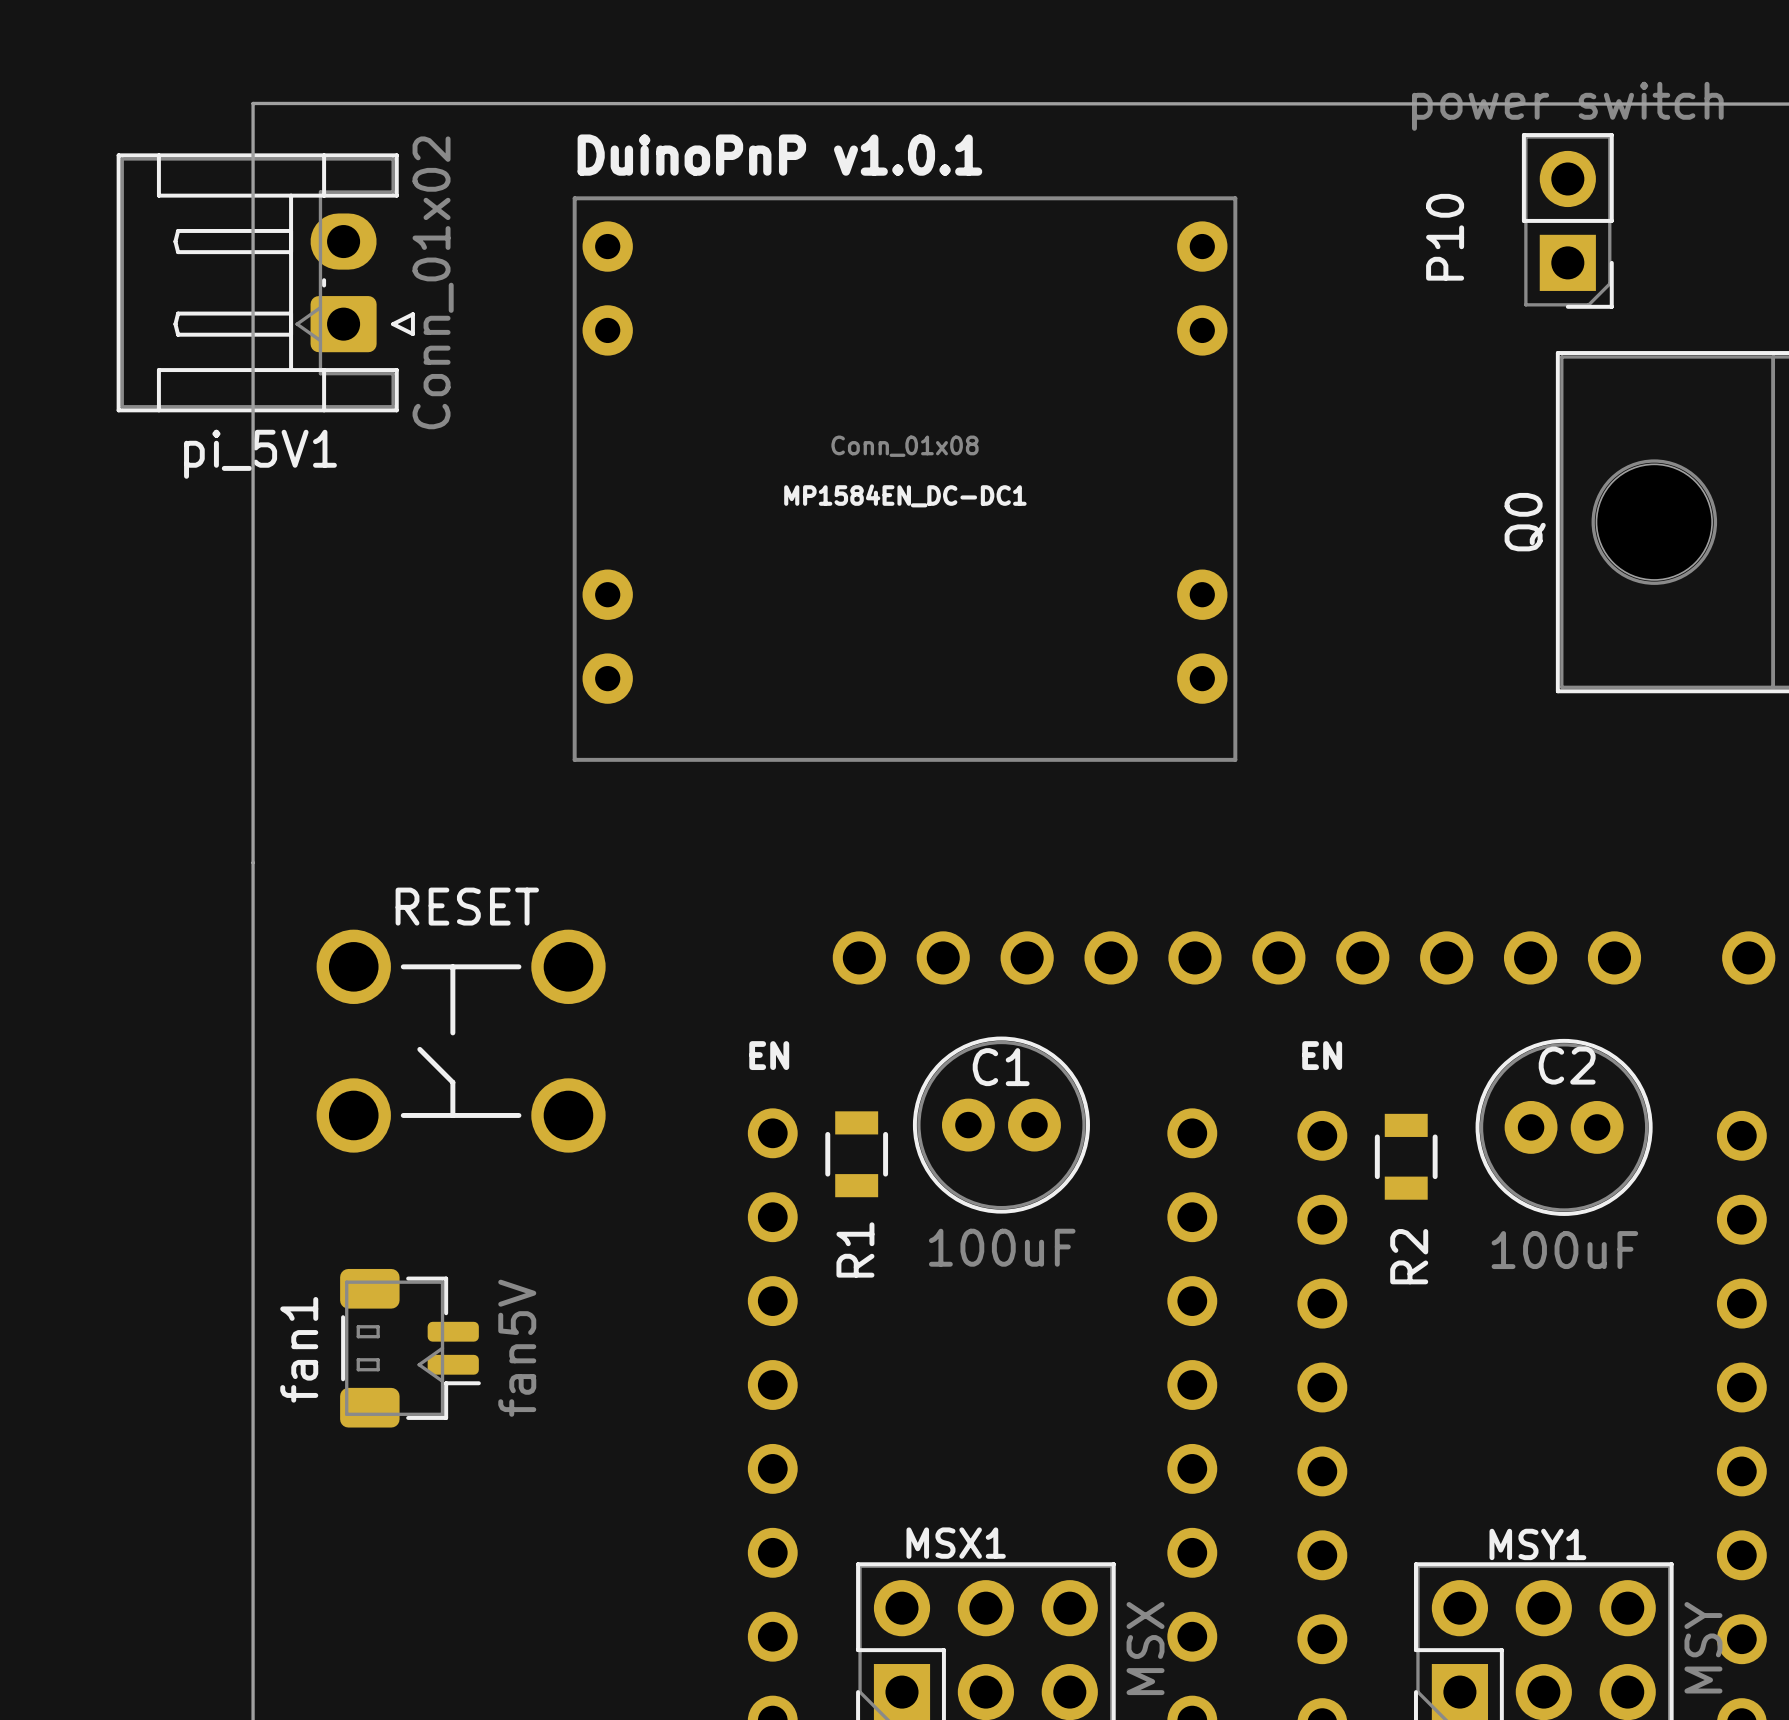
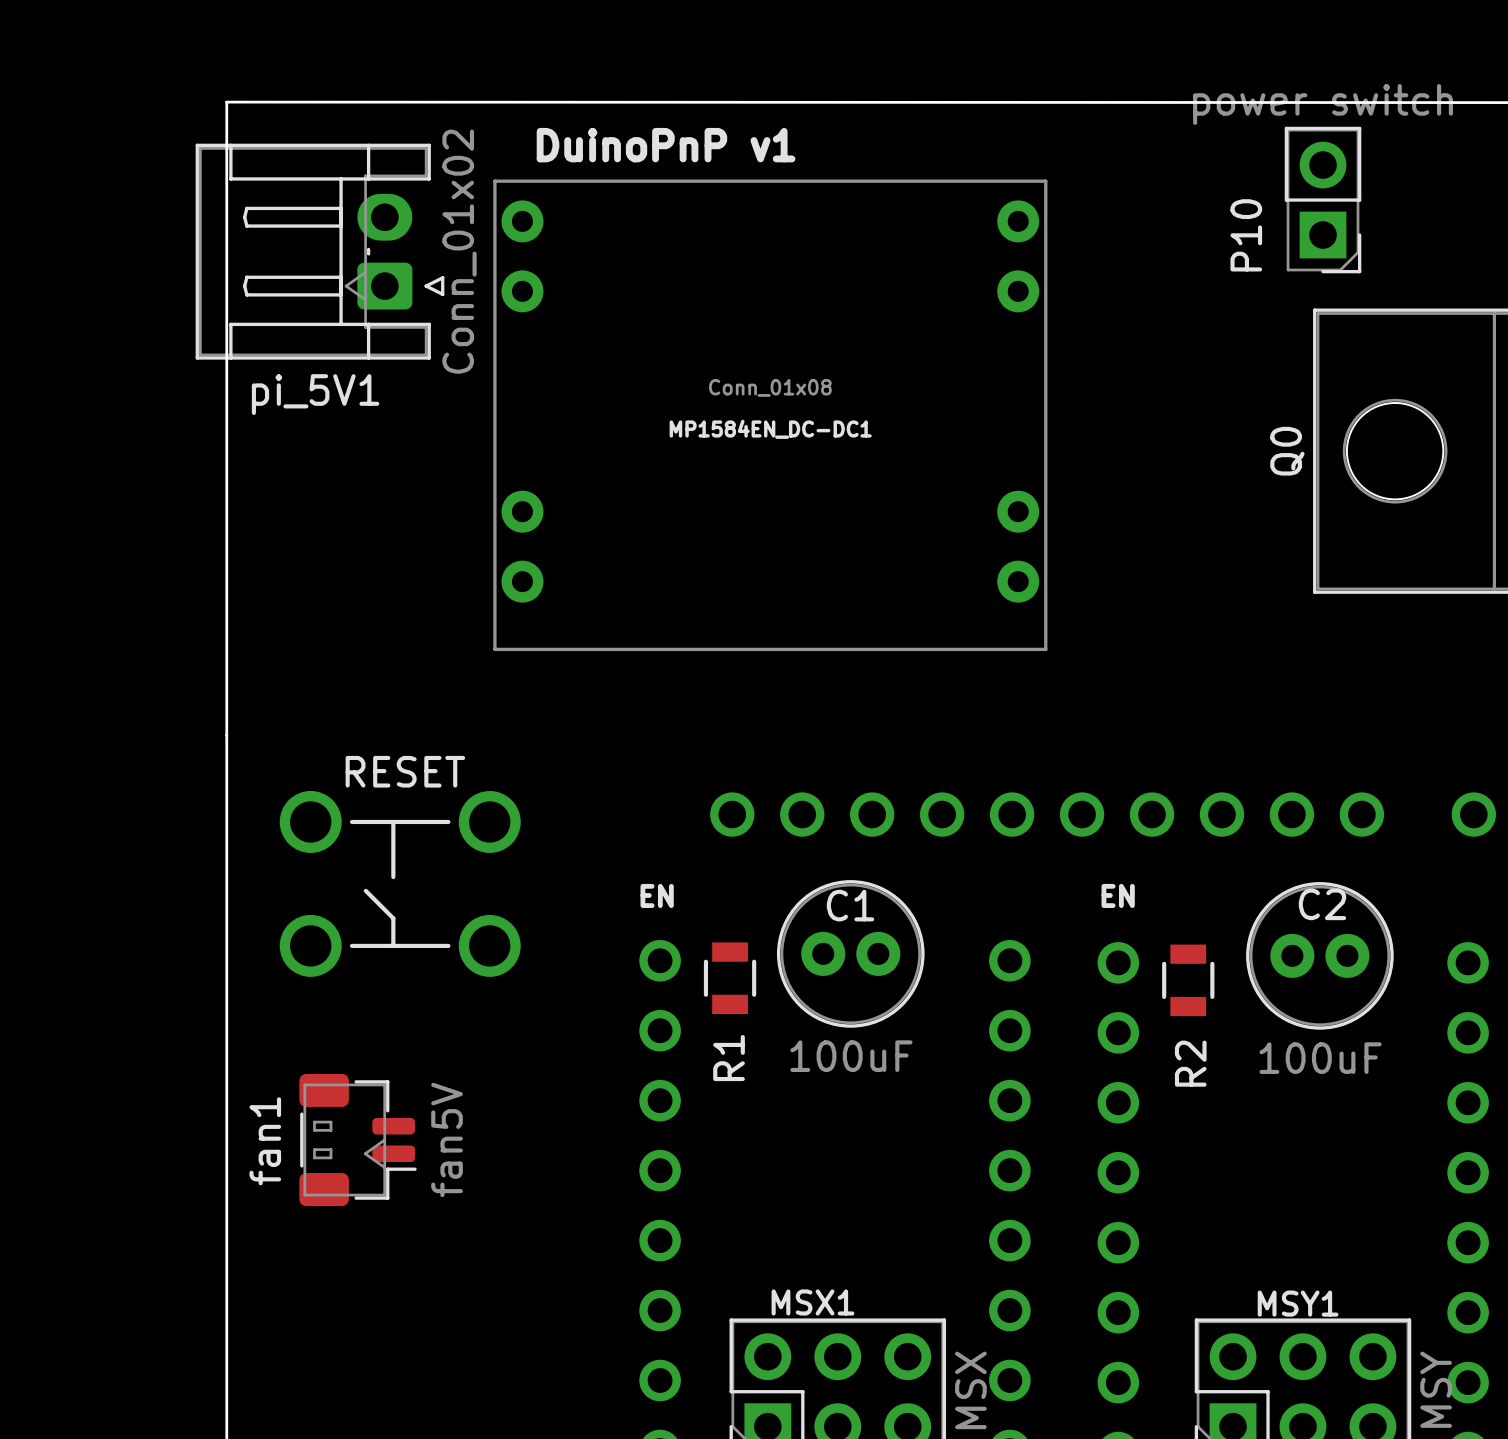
text: DuinoPnP v1.0.1 (779, 155) -> DuinoPnP v1 (666, 145)
P10 name position: P10 (1445, 237) -> P10 (1246, 235)
pi_5V1 position: (265, 282) -> (319, 251)

